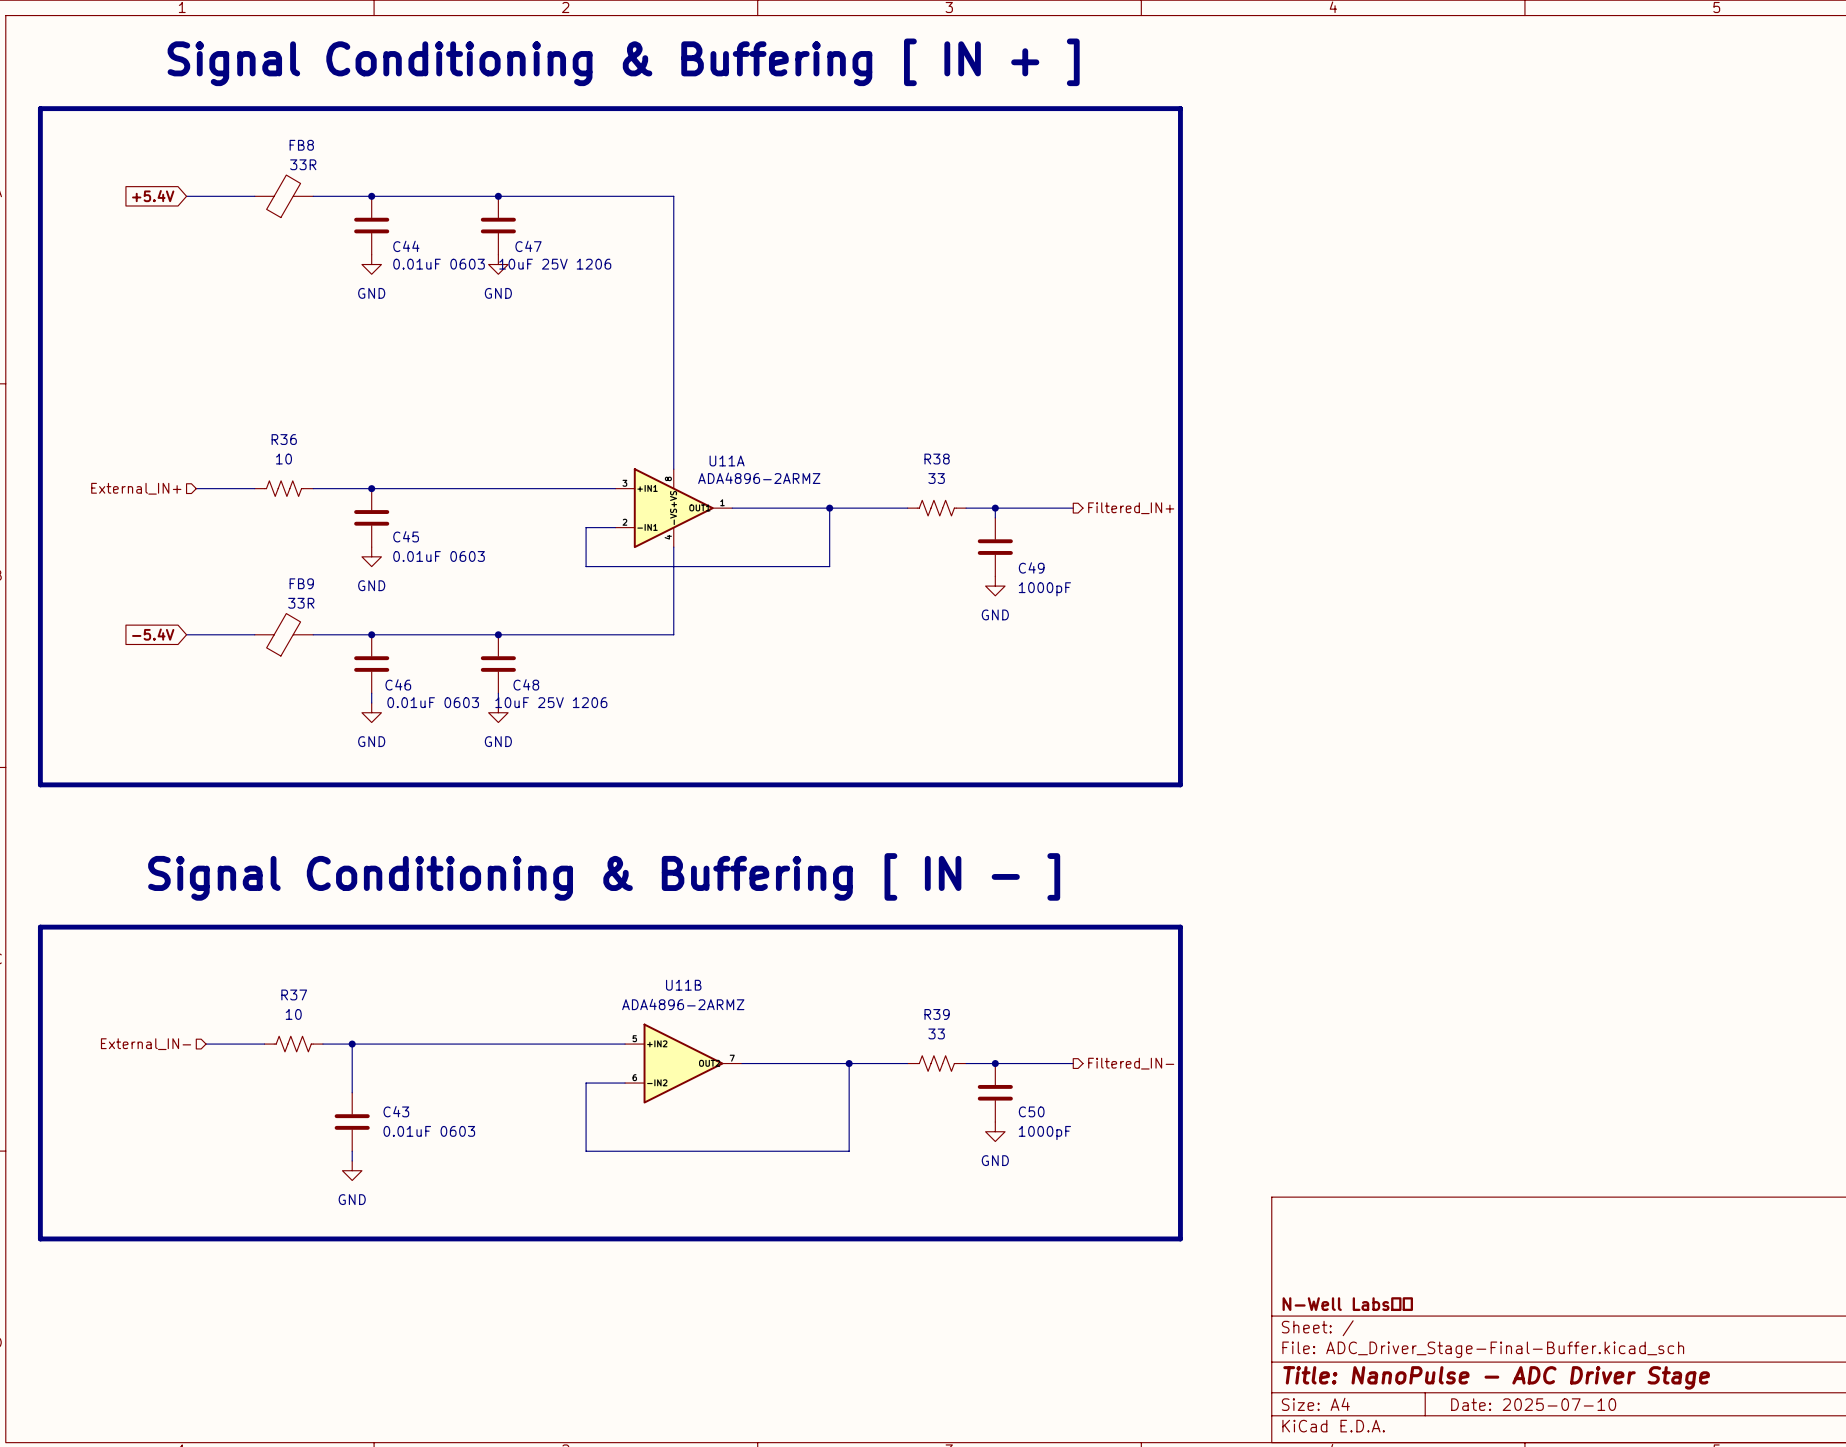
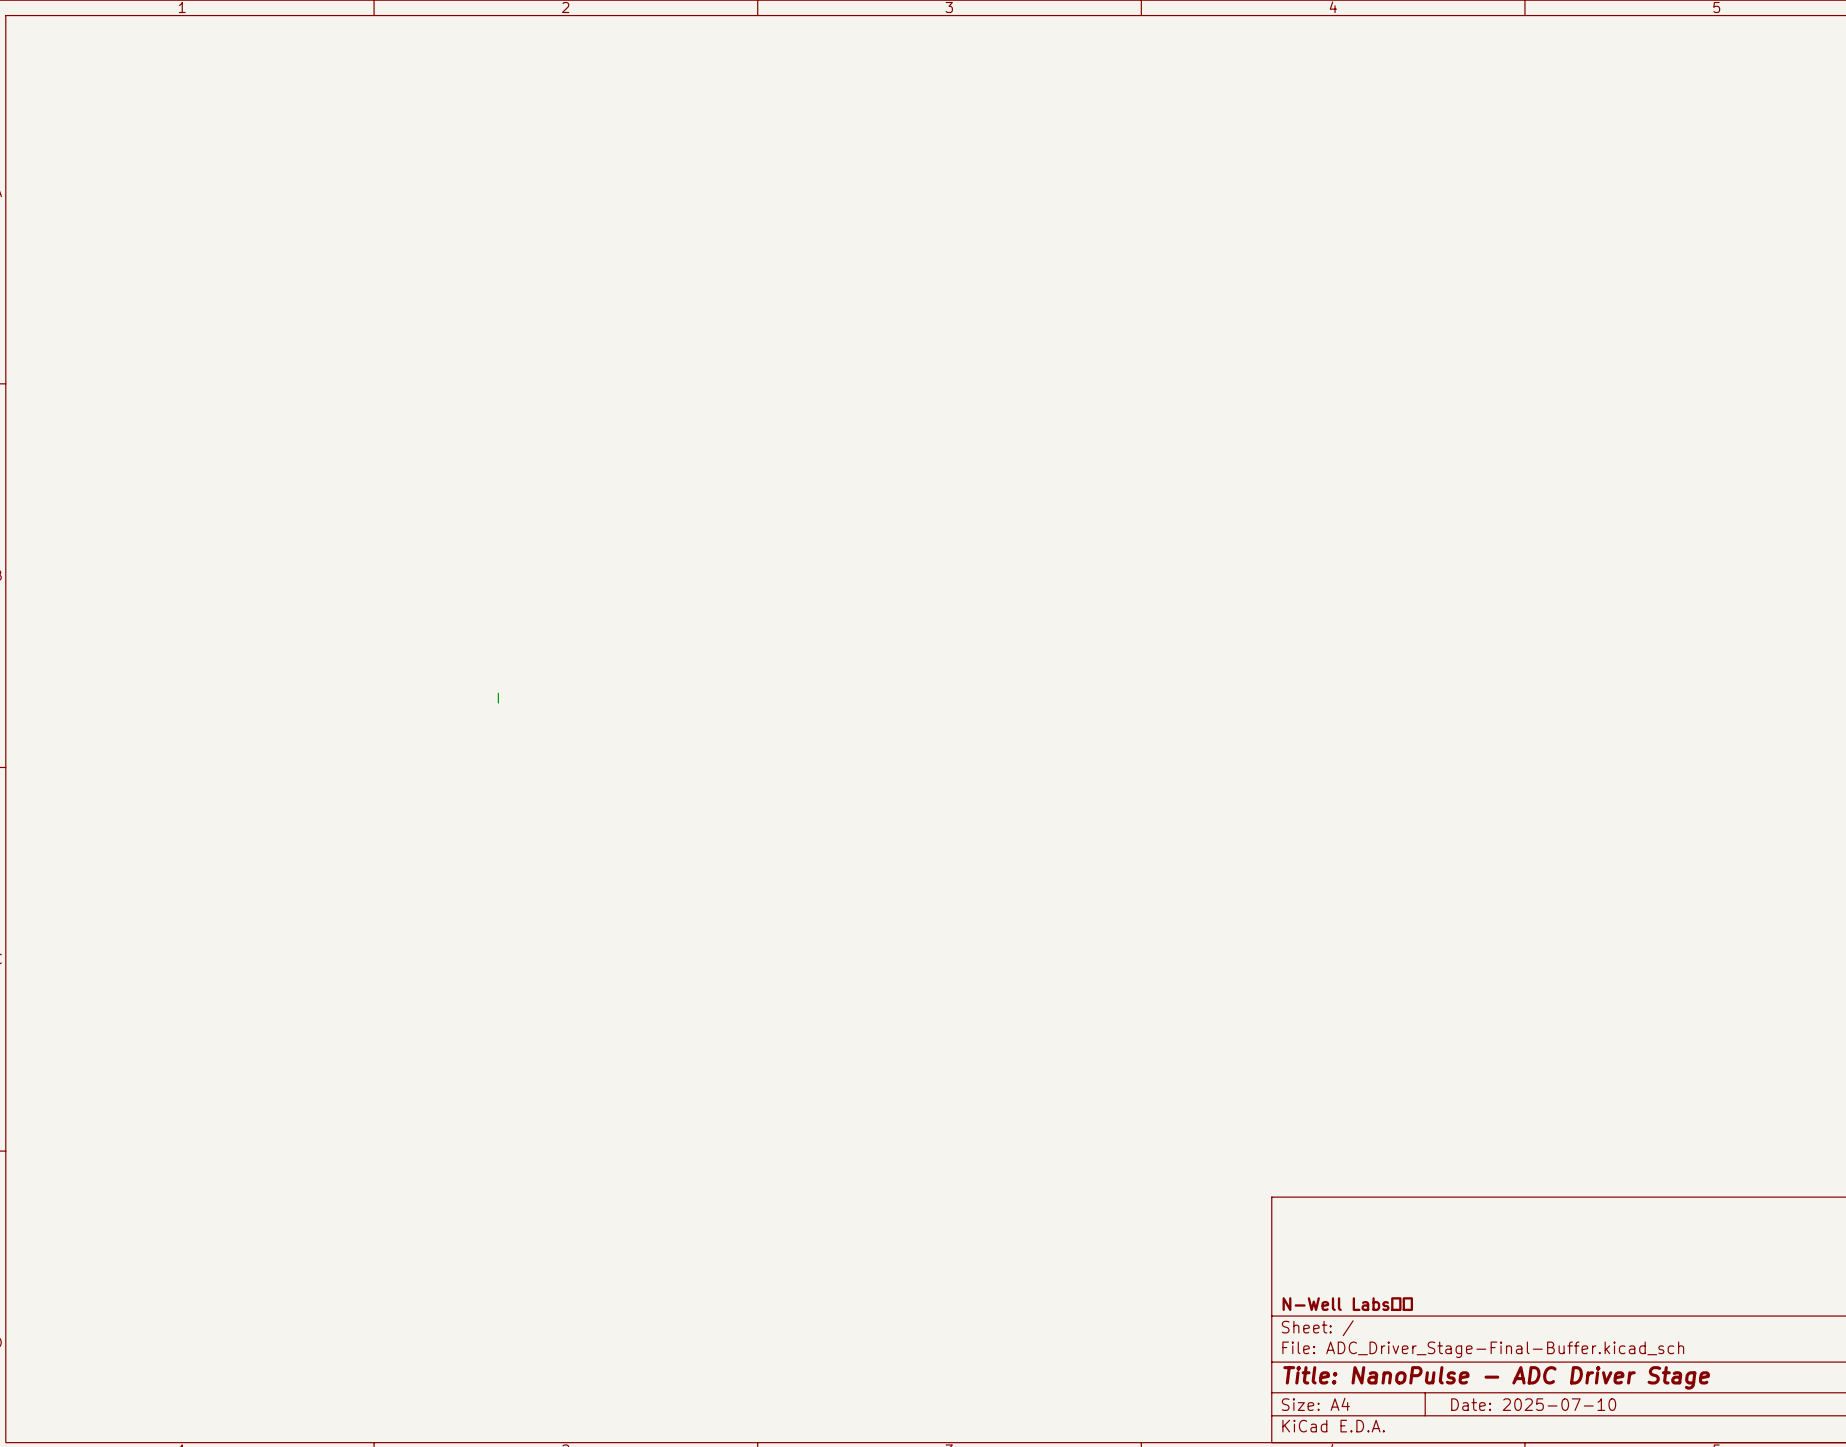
text: Signal Conditioning & Buffering [ IN + ] (623, 62) -> none
line: (40, 108) (1180, 108) (1180, 784) (40, 784) (40, 108) -> none
global label: +5.4V (153, 196) -> none
wire: (186, 196) (254, 196) -> none
FB8: 33R (283, 196) -> none
wire: (313, 196) (673, 196) (673, 469) -> none
junction: (371, 196) -> none
junction: (498, 196) -> none
C44: 0.01uF 0603 (371, 225) -> none
C47: 10uF 25V 1206 (498, 225) -> none
power symbol: GND (371, 264) -> none
power symbol: GND (498, 264) -> none
hierarchical label: External_IN+ (136, 488) -> none
wire: (196, 488) (254, 488) -> none
R36: 10 (283, 488) -> none
wire: (313, 488) (615, 488) -> none
junction: (371, 488) -> none
U11A: ADA4896-2ARMZ (673, 508) -> none
wire: (732, 508) (907, 508) -> none
wire: (829, 508) (829, 566) (586, 566) (586, 527) (615, 527) -> none
junction: (829, 508) -> none
R38: 33 (936, 508) -> none
wire: (966, 508) (1073, 508) -> none
wire: (995, 508) (995, 517) -> none
junction: (995, 508) -> none
hierarchical label: Filtered_IN+ (1131, 508) -> none
C45: 0.01uF 0603 (371, 517) -> none
wire: (673, 547) (673, 634) (313, 634) -> none
C49: 1000pF (995, 547) -> none
power symbol: GND (371, 556) -> none
power symbol: GND (995, 586) -> none
global label: -5.4V (153, 634) -> none
wire: (186, 634) (254, 634) -> none
FB9: 33R (283, 634) -> none
junction: (371, 634) -> none
junction: (498, 634) -> none
C46: 0.01uF 0603 (371, 664) -> none
C48: 10uF 25V 1206 (498, 664) -> none
wire: (371, 693) (371, 703) -> none
power symbol: GND (371, 712) -> none
power symbol: GND (498, 712) -> none
text: Signal Conditioning & Buffering [ IN - ] (604, 876) -> none
line: (40, 927) (40, 1238) (1180, 1238) (1180, 927) (40, 927) -> none
hierarchical label: External_IN- (146, 1044) -> none
wire: (206, 1044) (264, 1044) -> none
R37: 10 (293, 1044) -> none
wire: (322, 1044) (625, 1044) -> none
wire: (352, 1044) (352, 1092) -> none
junction: (352, 1044) -> none
U11B: ADA4896-2ARMZ (683, 1063) -> none
wire: (741, 1063) (907, 1063) -> none
wire: (849, 1063) (849, 1151) (586, 1151) (586, 1083) (625, 1083) -> none
junction: (849, 1063) -> none
R39: 33 (936, 1063) -> none
wire: (966, 1063) (1073, 1063) -> none
junction: (995, 1063) -> none
hierarchical label: Filtered_IN- (1131, 1063) -> none
C50: 1000pF (995, 1092) -> none
C43: 0.01uF 0603 (352, 1122) -> none
power symbol: GND (995, 1131) -> none
wire: (352, 1151) (352, 1160) -> none
power symbol: GND (352, 1170) -> none

